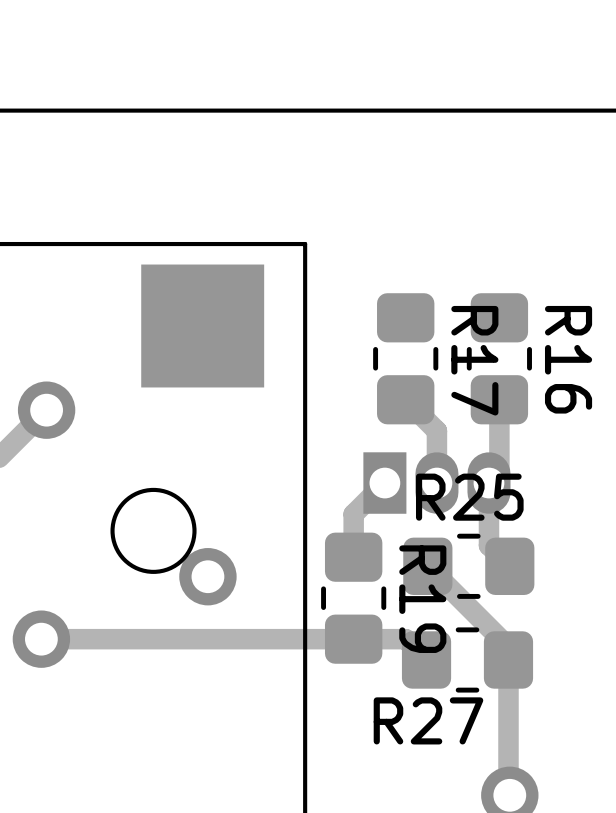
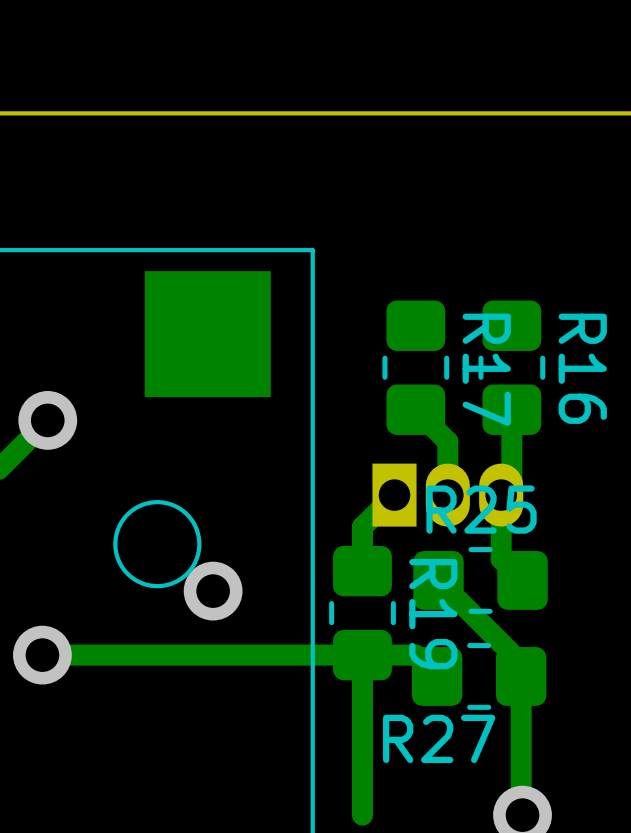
track: none -> (362, 655) (362, 815)

